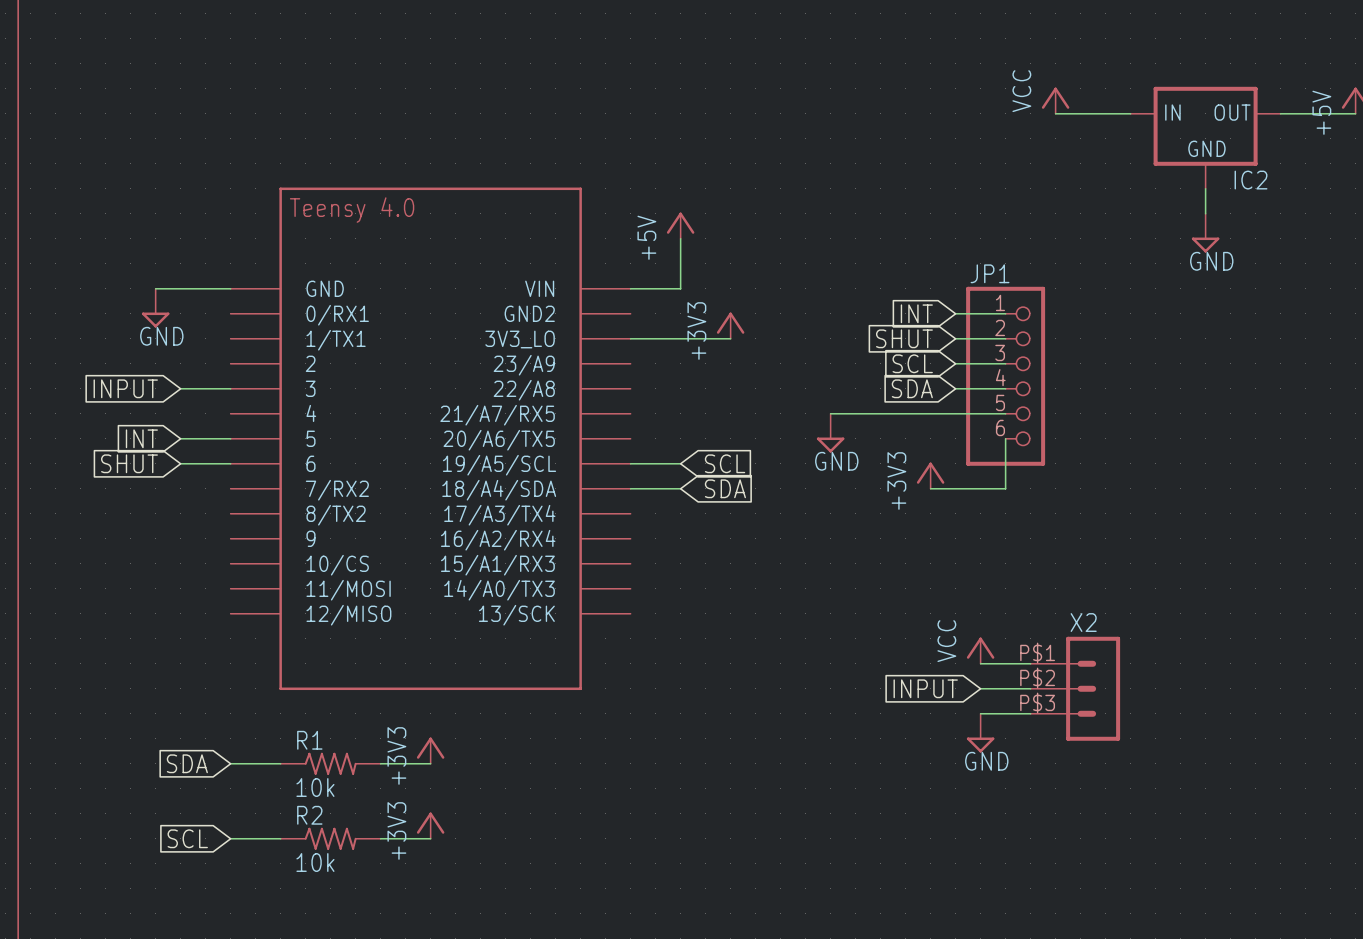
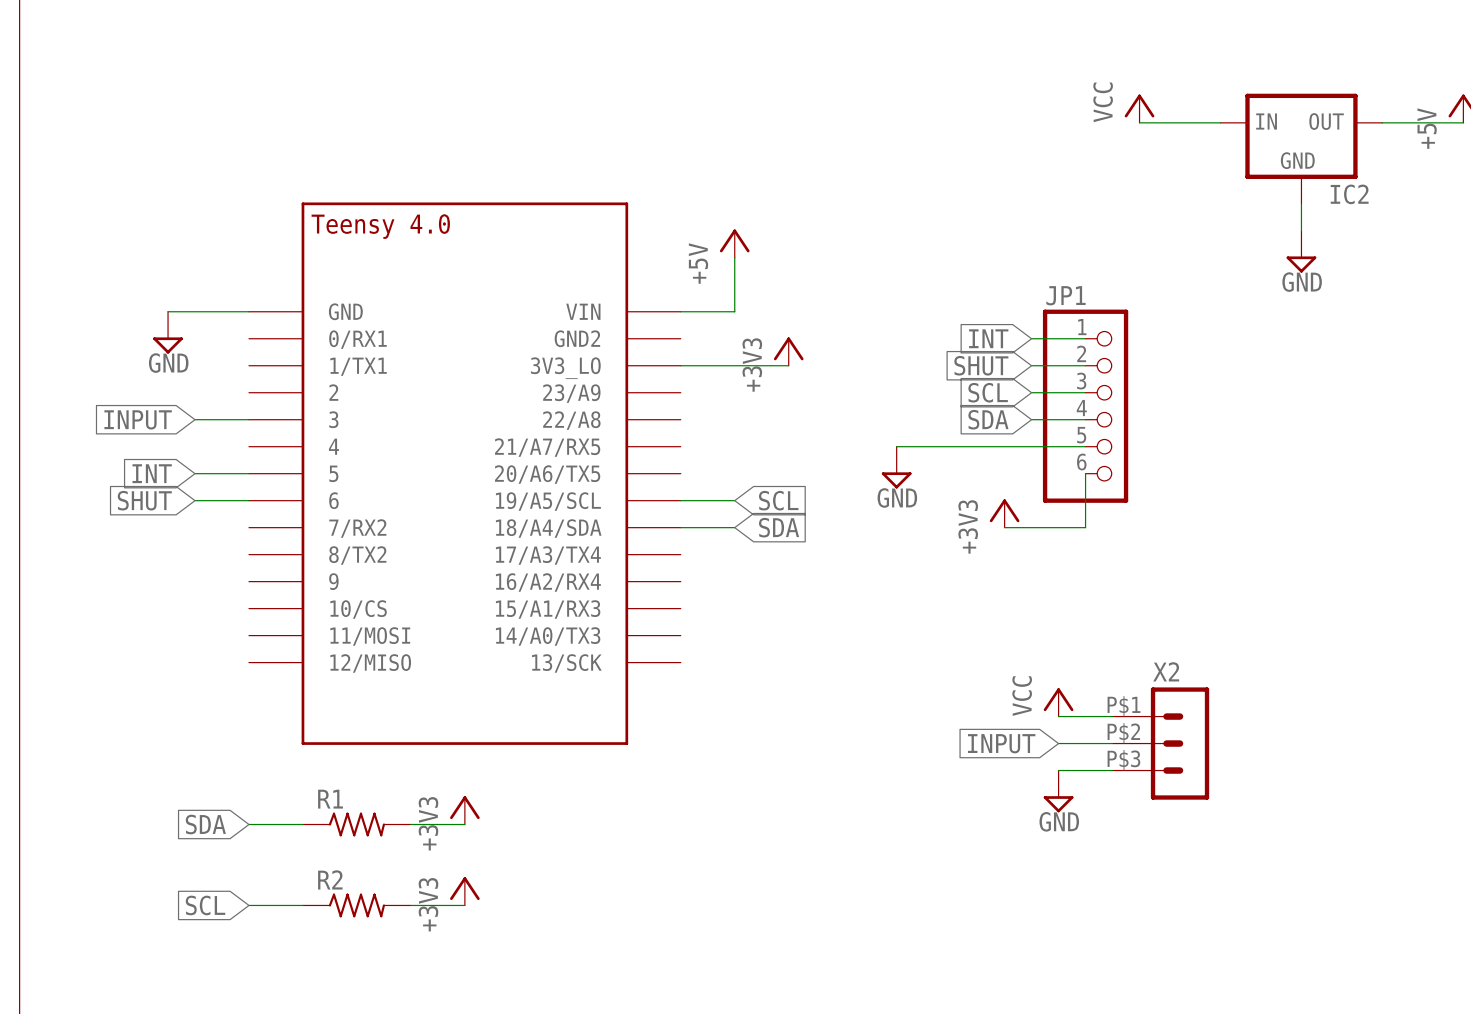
R1 value: 10k (315, 787) -> none
R2 value: 10k (315, 862) -> none

